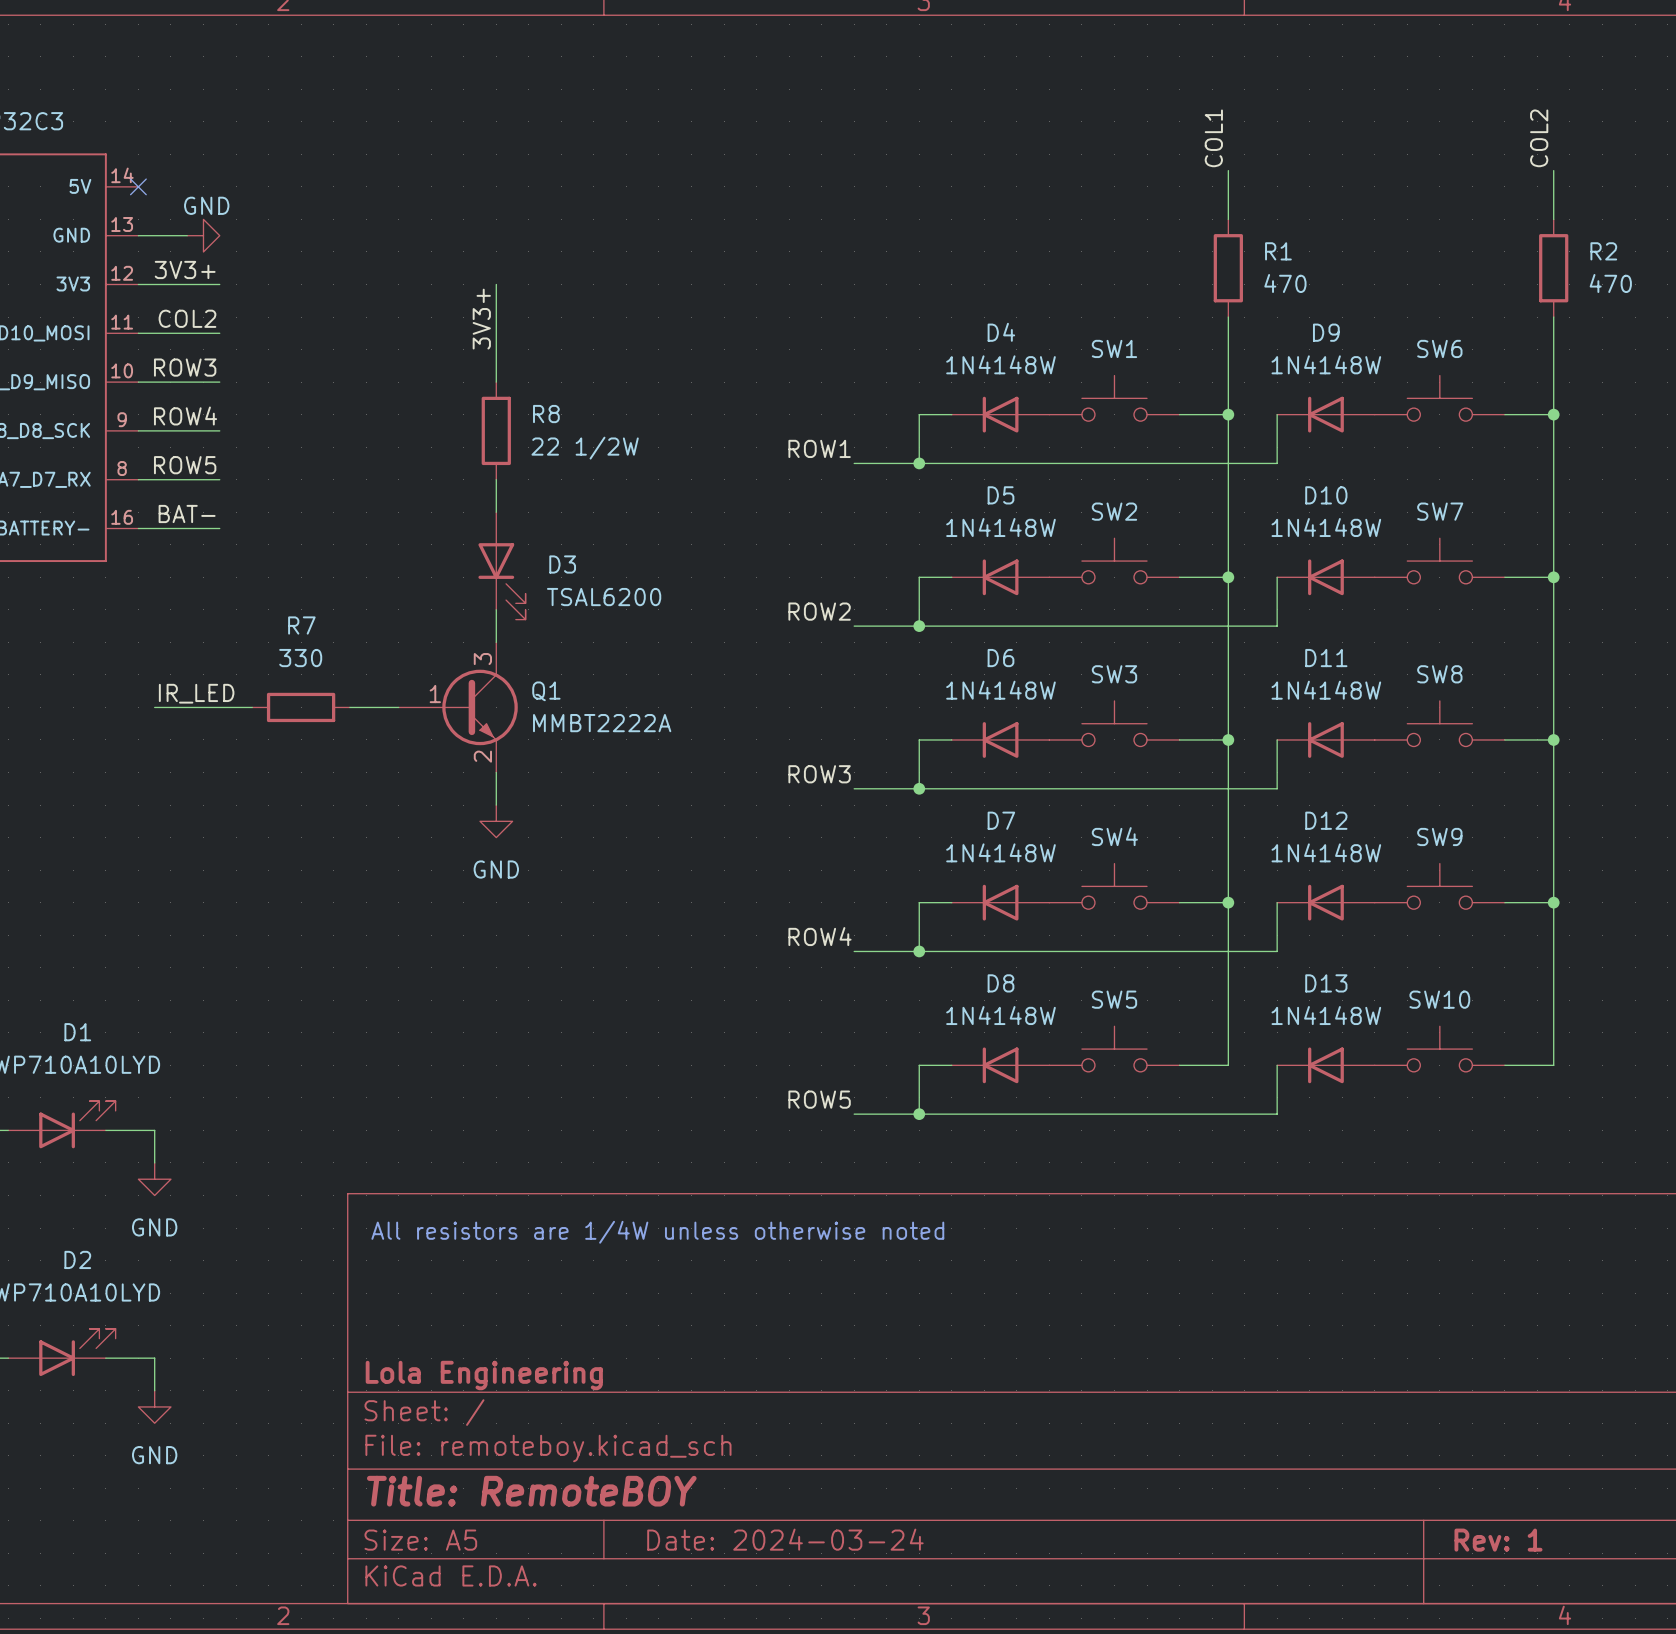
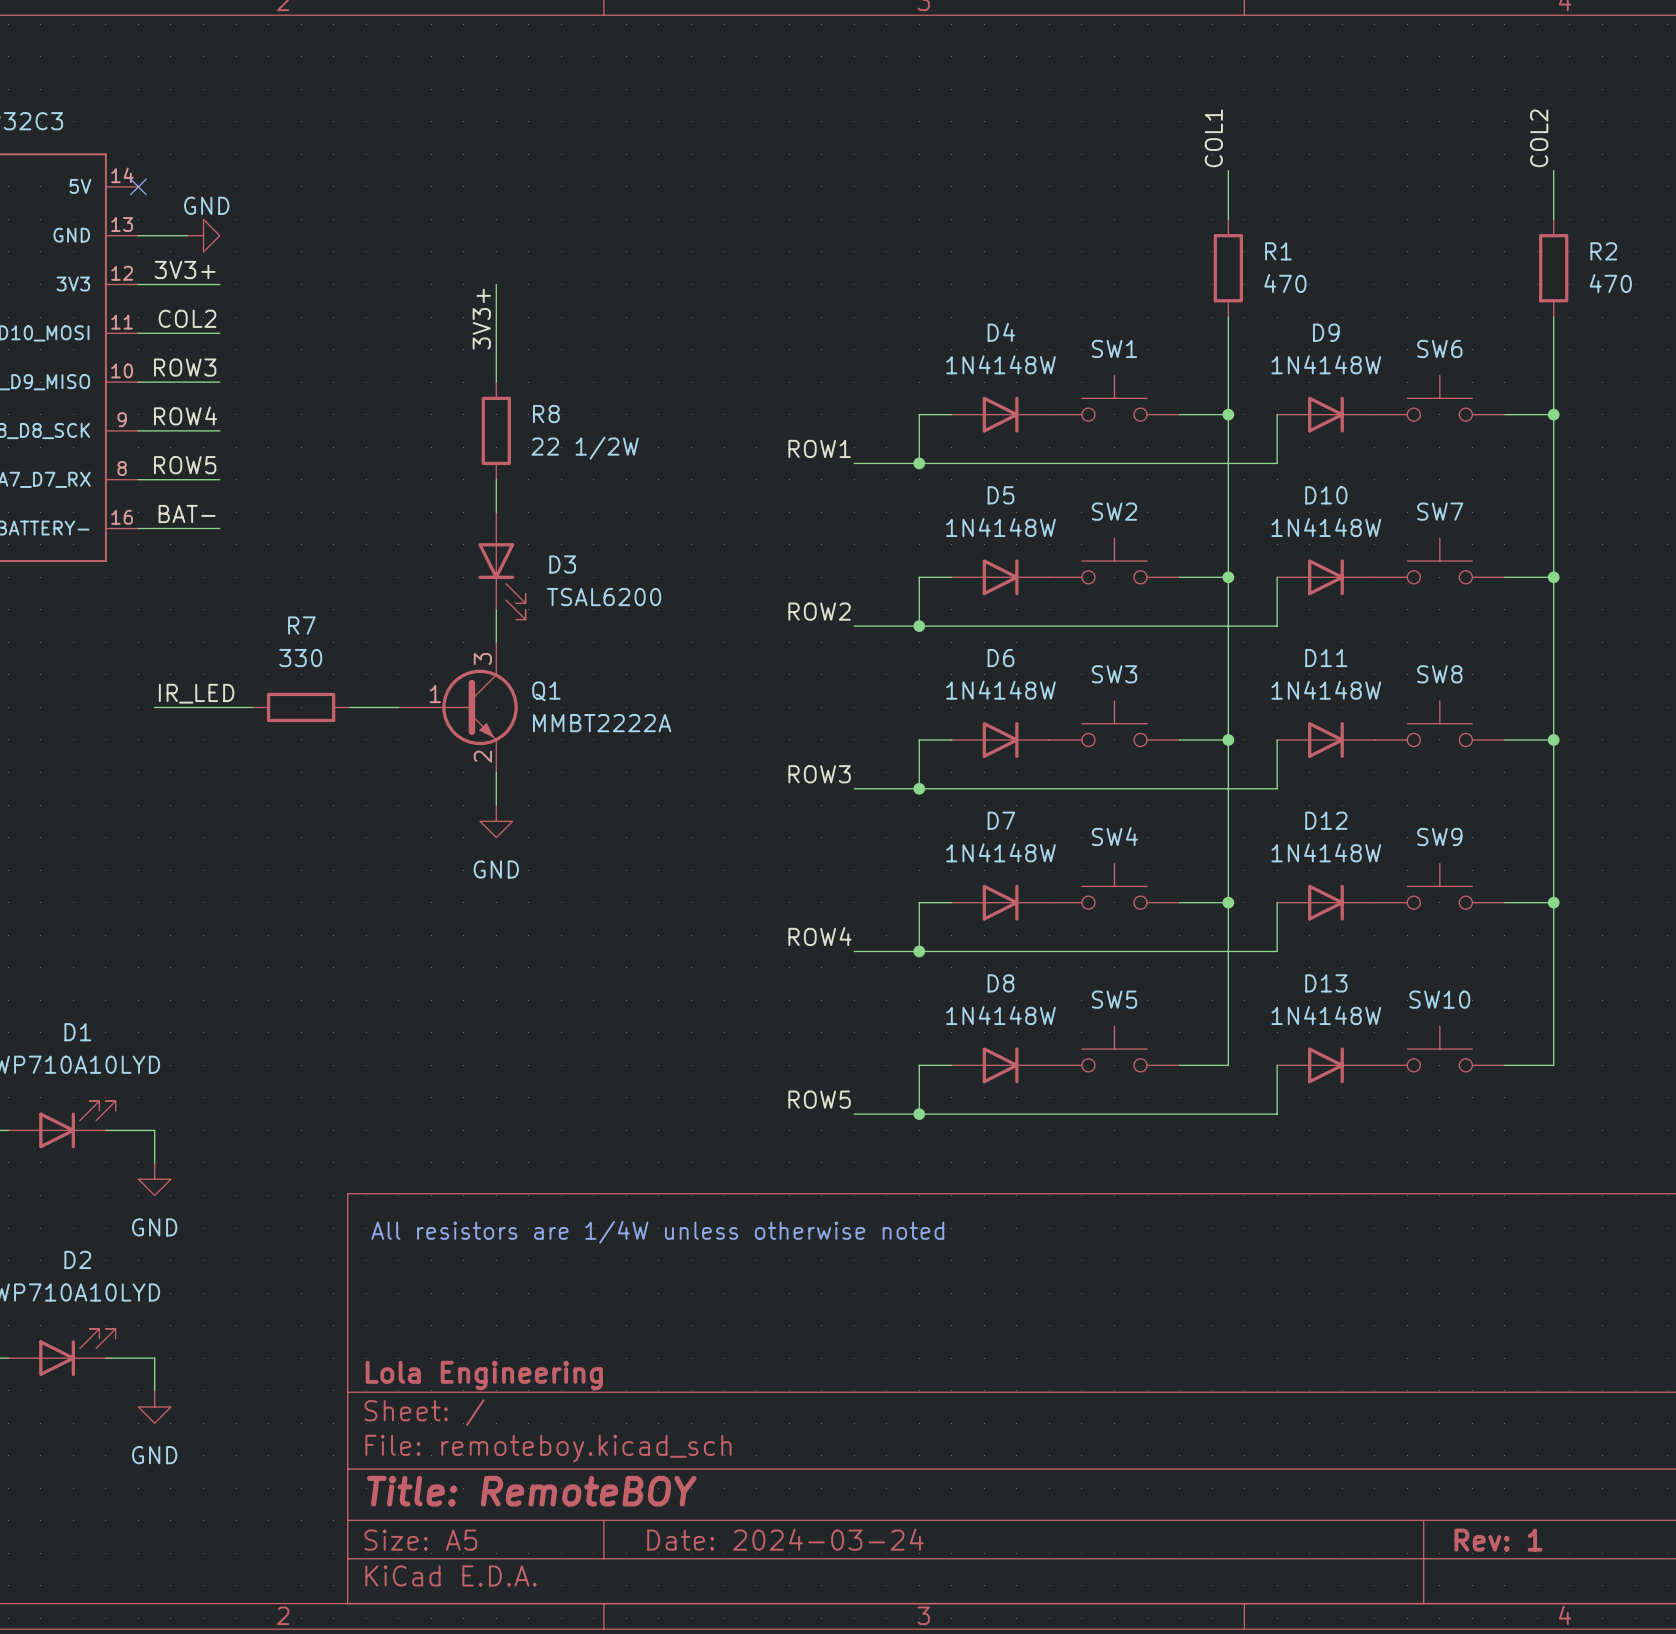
D4 rotation: 0° (1000, 414) -> 180° (1000, 414)
D9 rotation: 0° (1325, 414) -> 180° (1325, 414)
D5 rotation: 0° (1000, 577) -> 180° (1000, 577)
D10 rotation: 0° (1325, 577) -> 180° (1325, 577)
D6 rotation: 0° (1000, 739) -> 180° (1000, 739)
D11 rotation: 0° (1325, 739) -> 180° (1325, 739)
D7 rotation: 0° (1000, 902) -> 180° (1000, 902)
D12 rotation: 0° (1325, 902) -> 180° (1325, 902)
D8 rotation: 0° (1000, 1065) -> 180° (1000, 1065)
D13 rotation: 0° (1325, 1065) -> 180° (1325, 1065)

